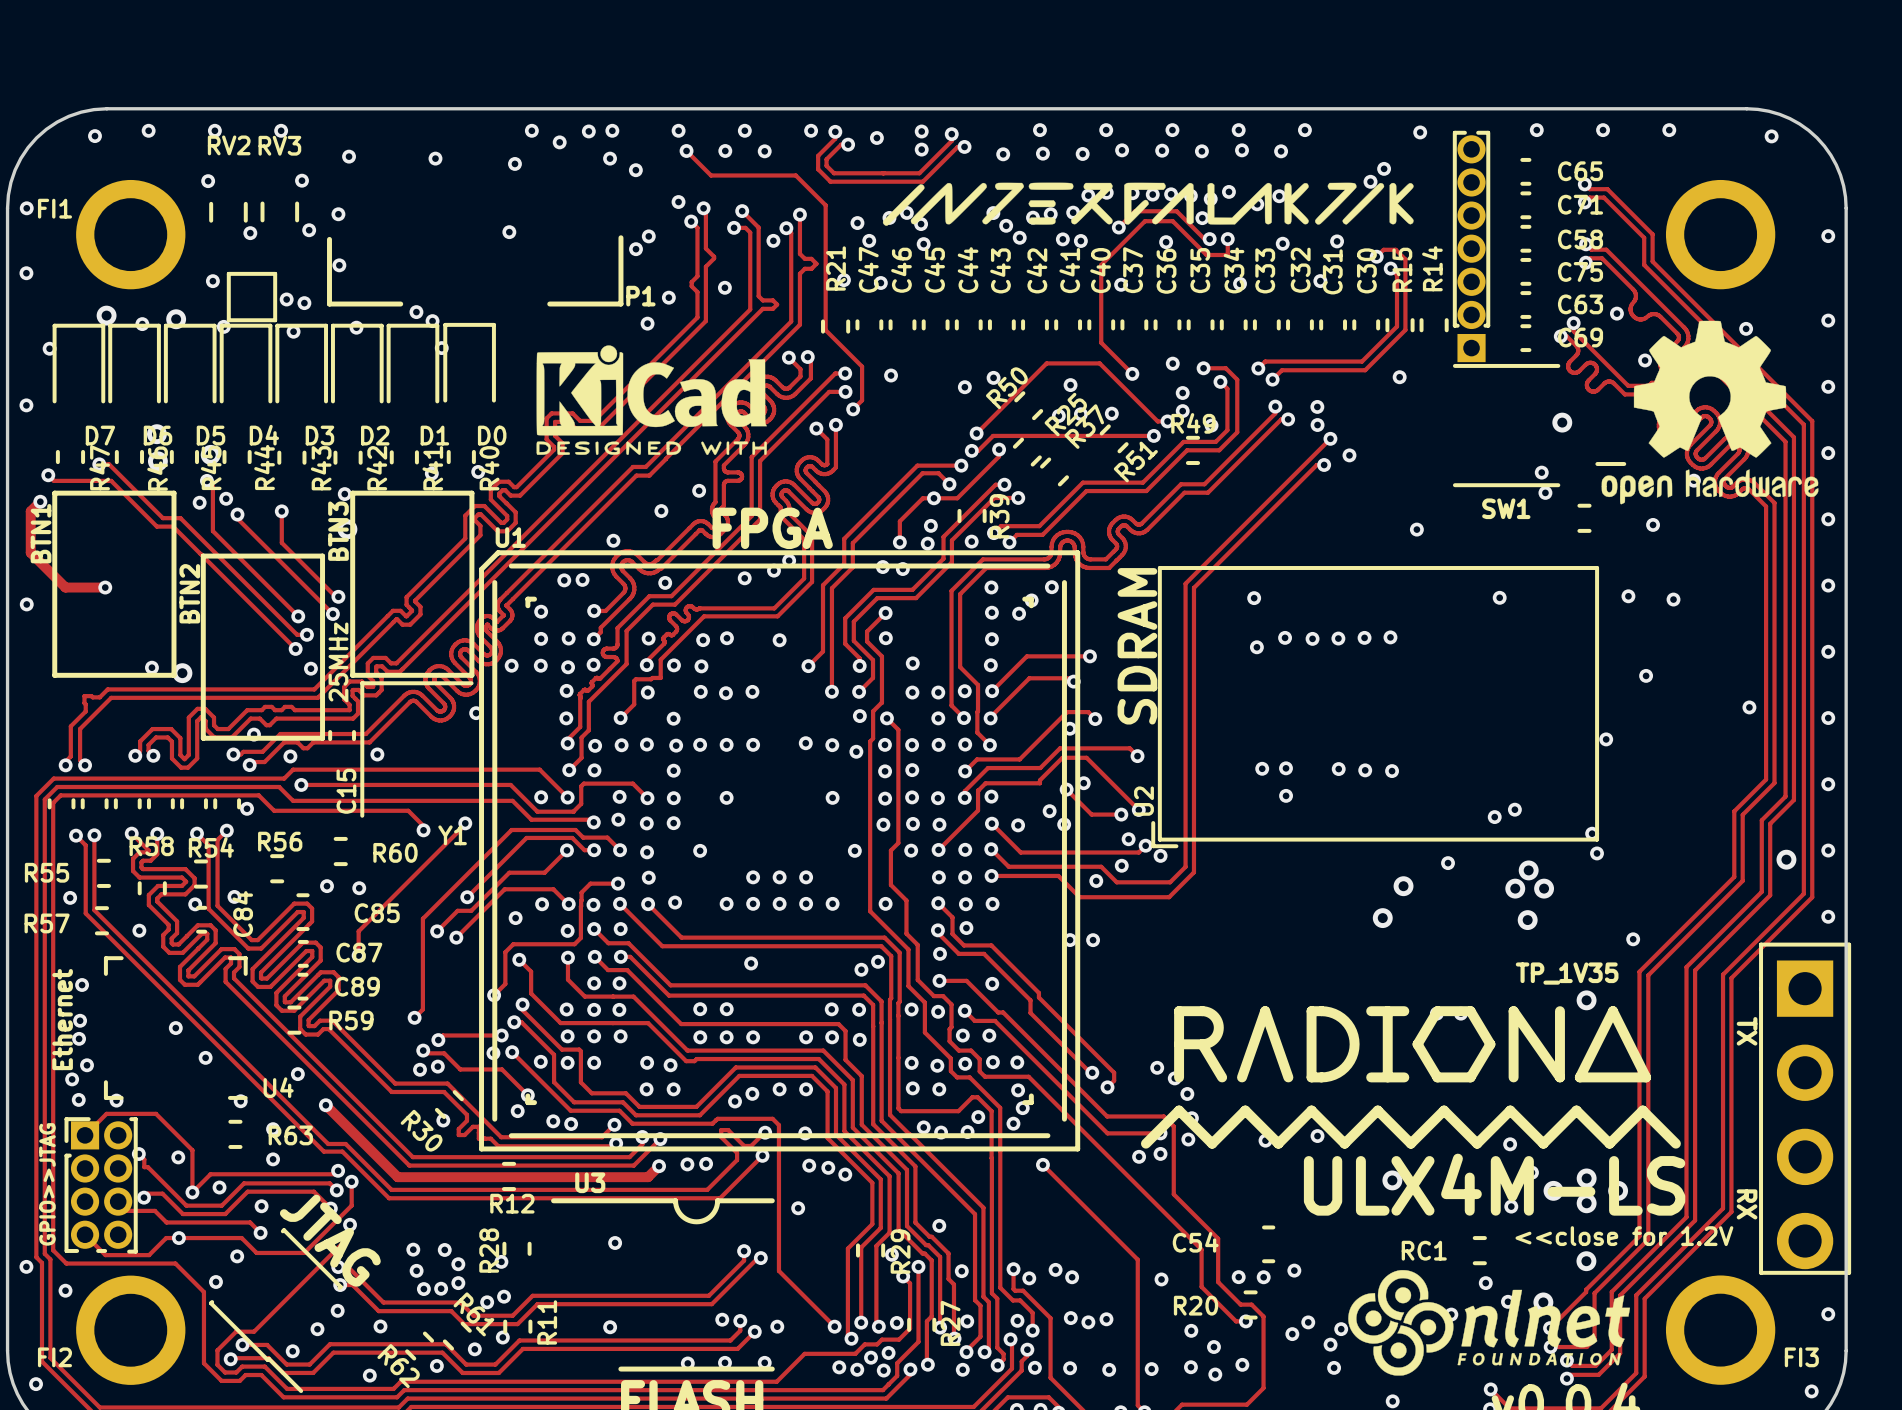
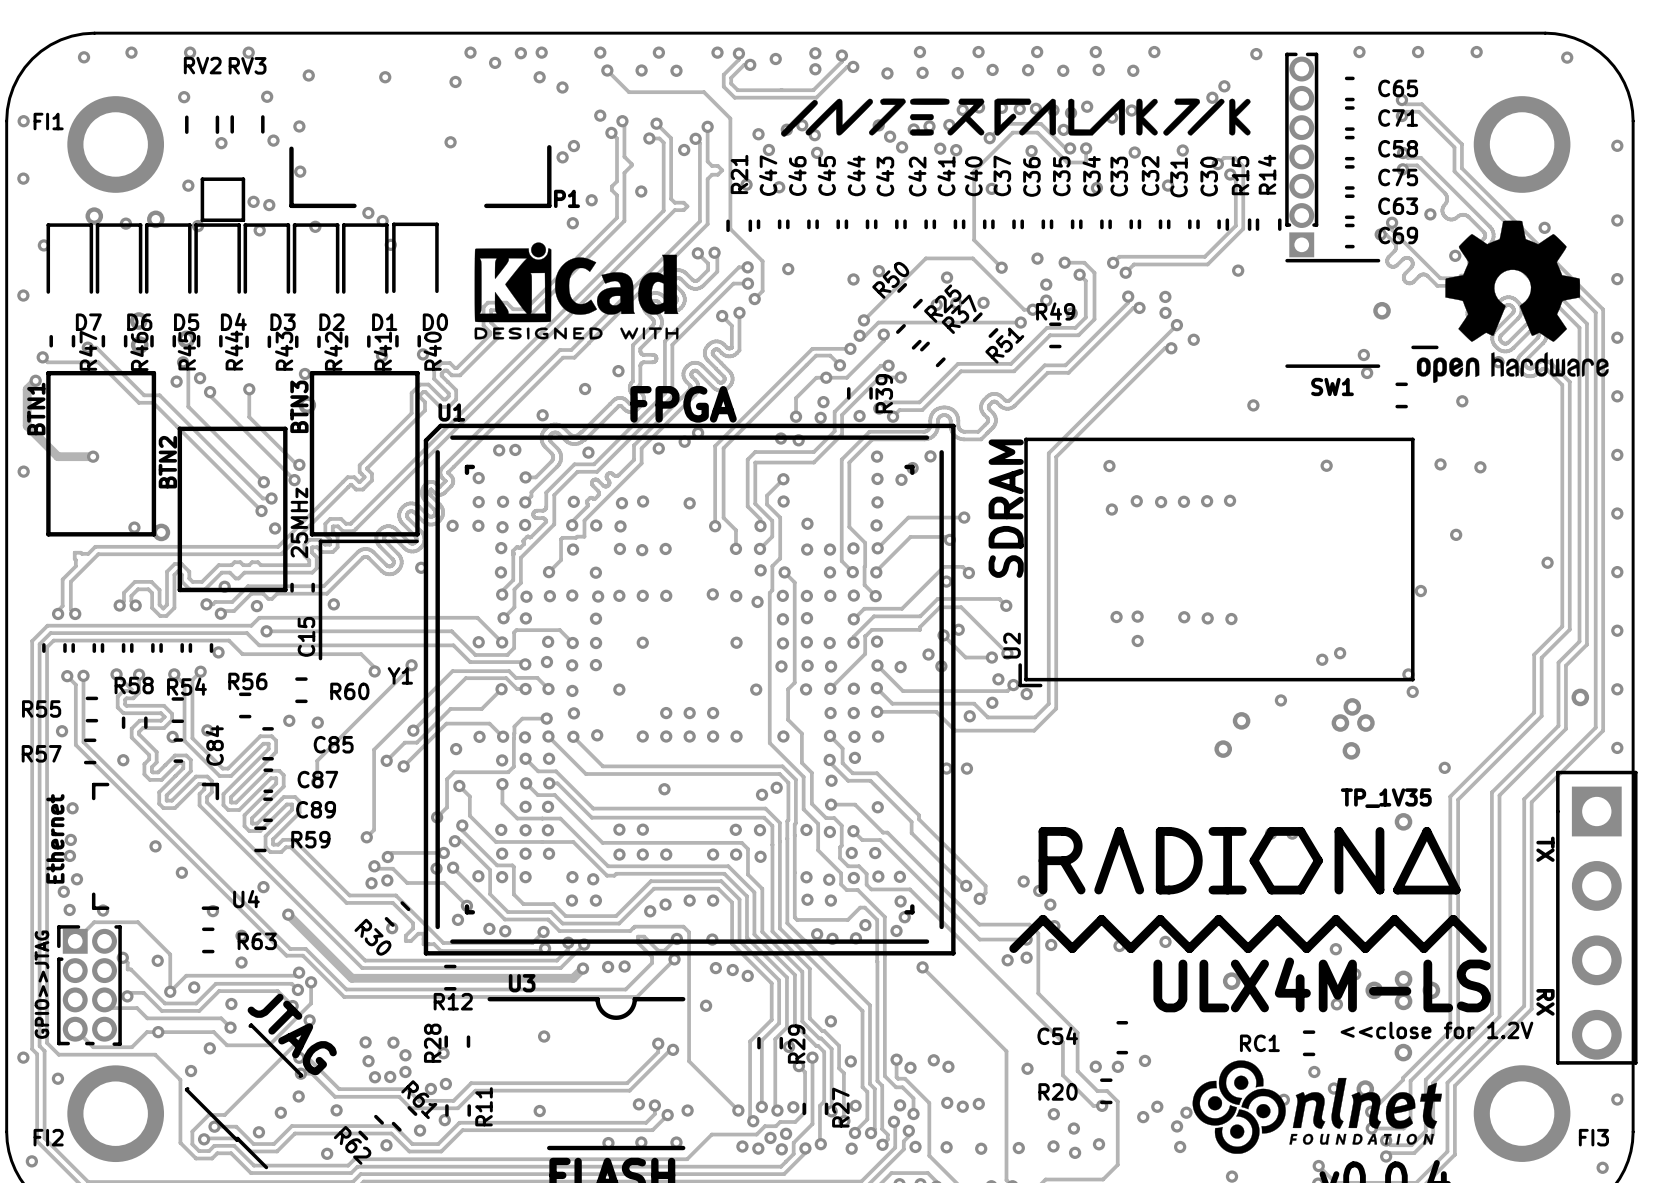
track: (918, 465) (844, 538) (844, 564) (823, 585) (823, 651) (808, 666) -> (812, 348) (715, 446) (715, 526)
track: (780, 509) (780, 515) (804, 539) (804, 578) (774, 608) (699, 608) -> (690, 387) (633, 445) (633, 459) (618, 474)
track: (789, 510) (789, 513) (812, 536) (812, 581) (777, 616) (704, 616) -> (698, 388) (695, 394) (641, 448) (641, 463) (622, 482)
track: (852, 543) (852, 567) (831, 588) (831, 670) -> (754, 417) (723, 448) (723, 517) (735, 530)
track: (920, 582) (912, 589) (873, 589) (845, 618) -> (813, 452) (755, 452) (747, 459) (747, 483)
track: (920, 594) (916, 598) (877, 598) (853, 621) -> (813, 462) (755, 462) (755, 486)

